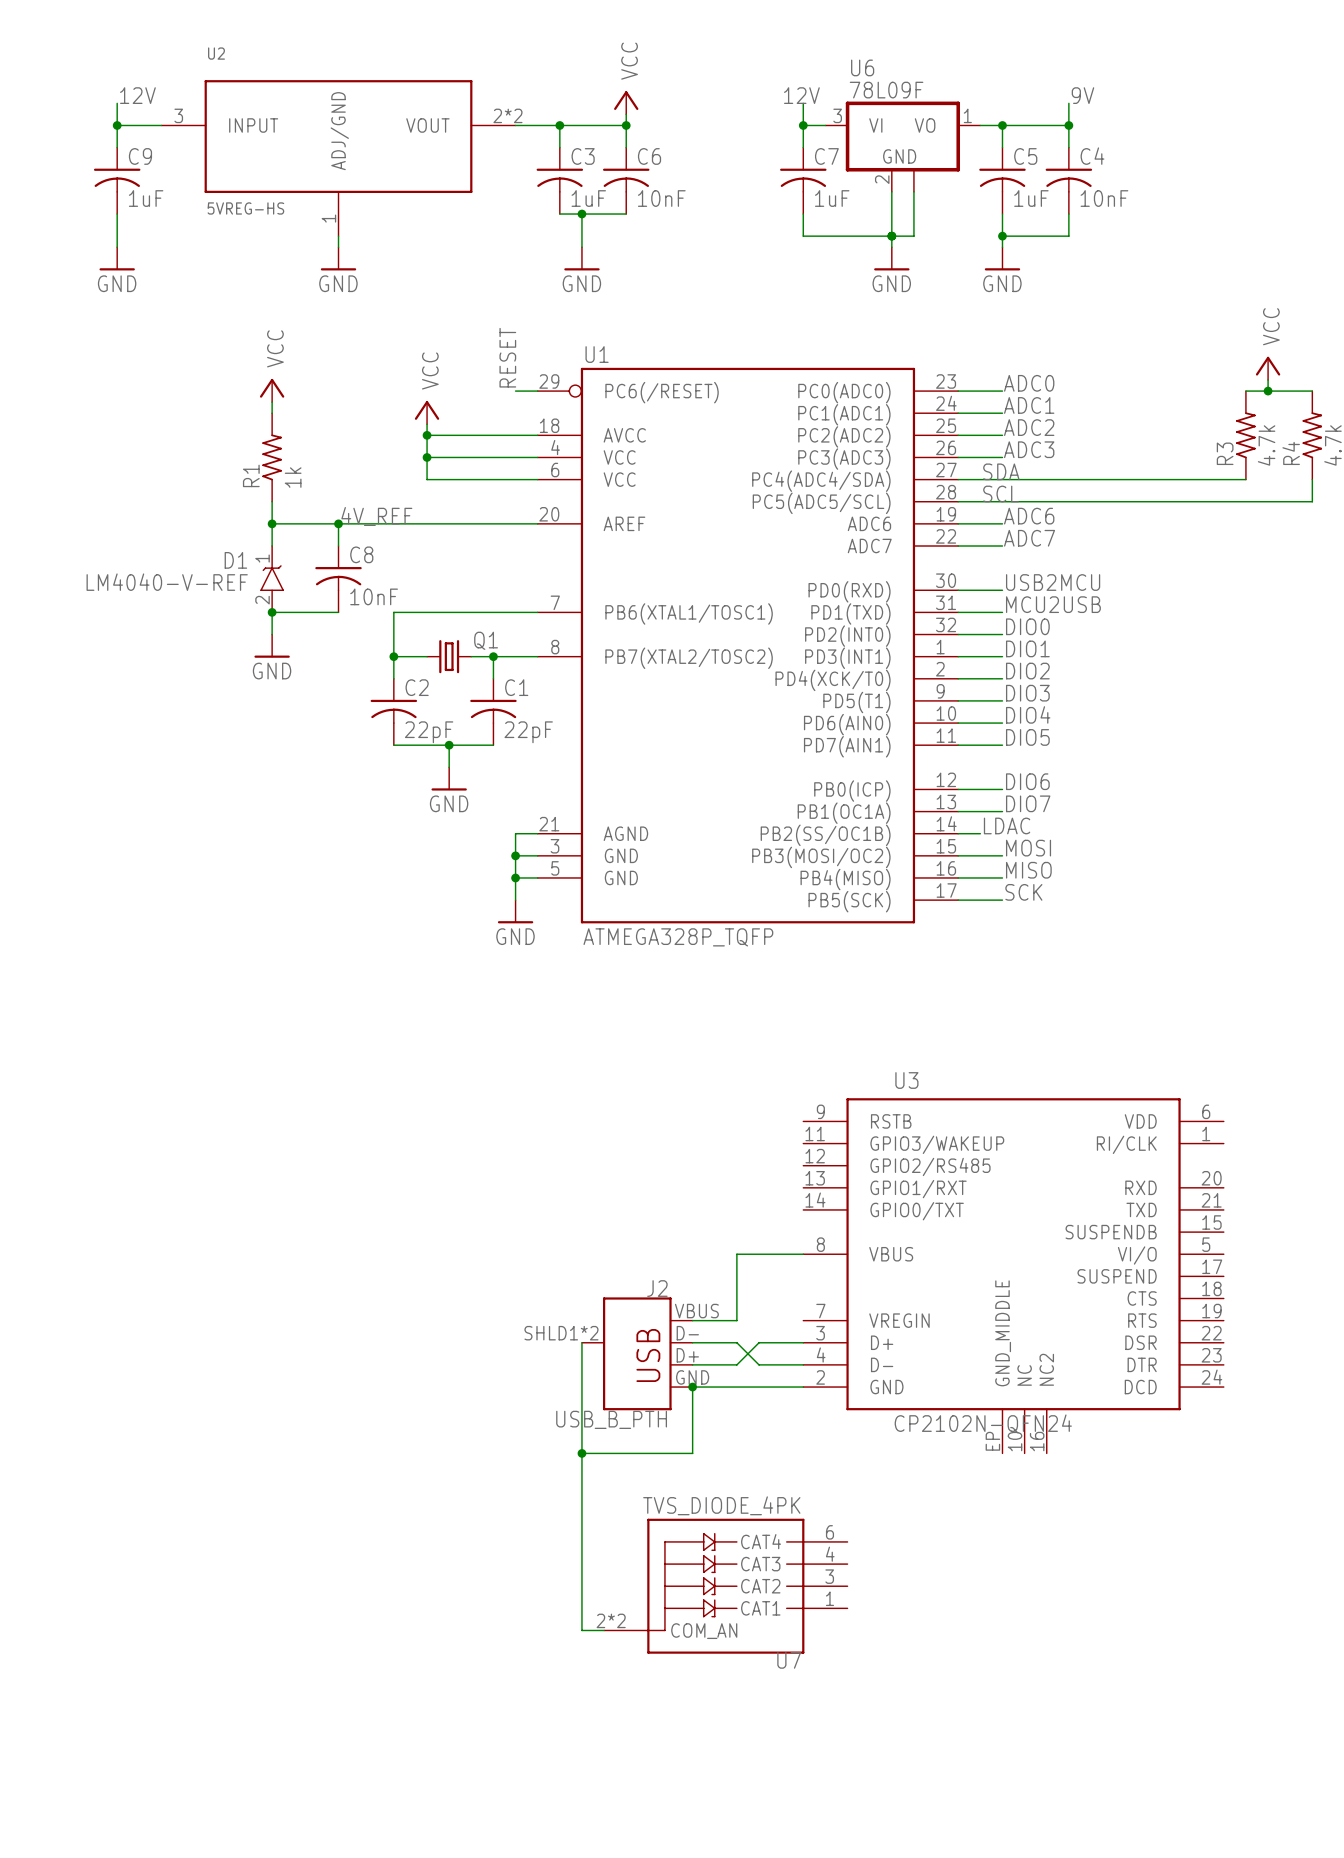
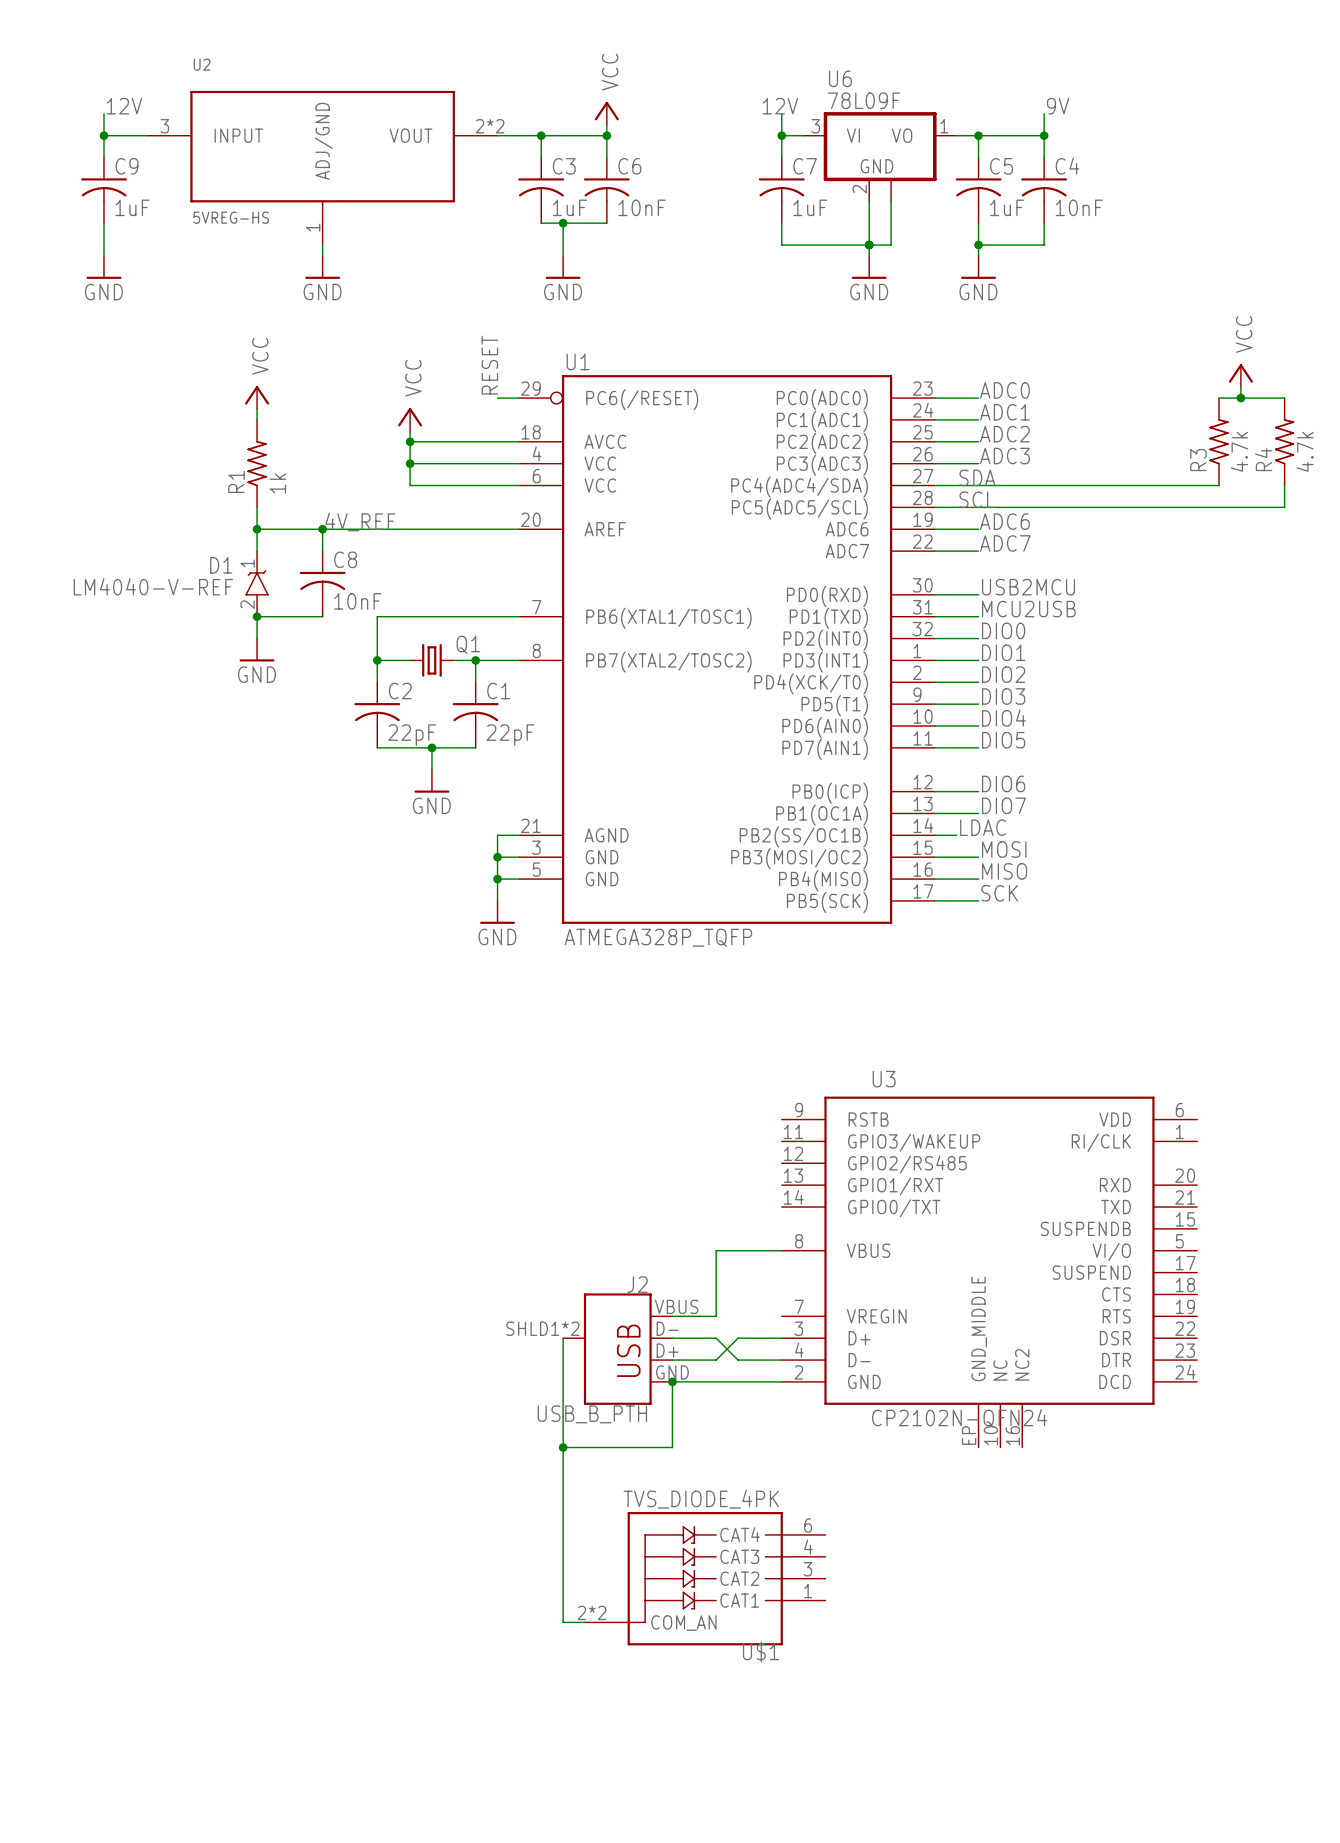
U7 name: U7 (789, 1660) -> U$1 (760, 1651)

